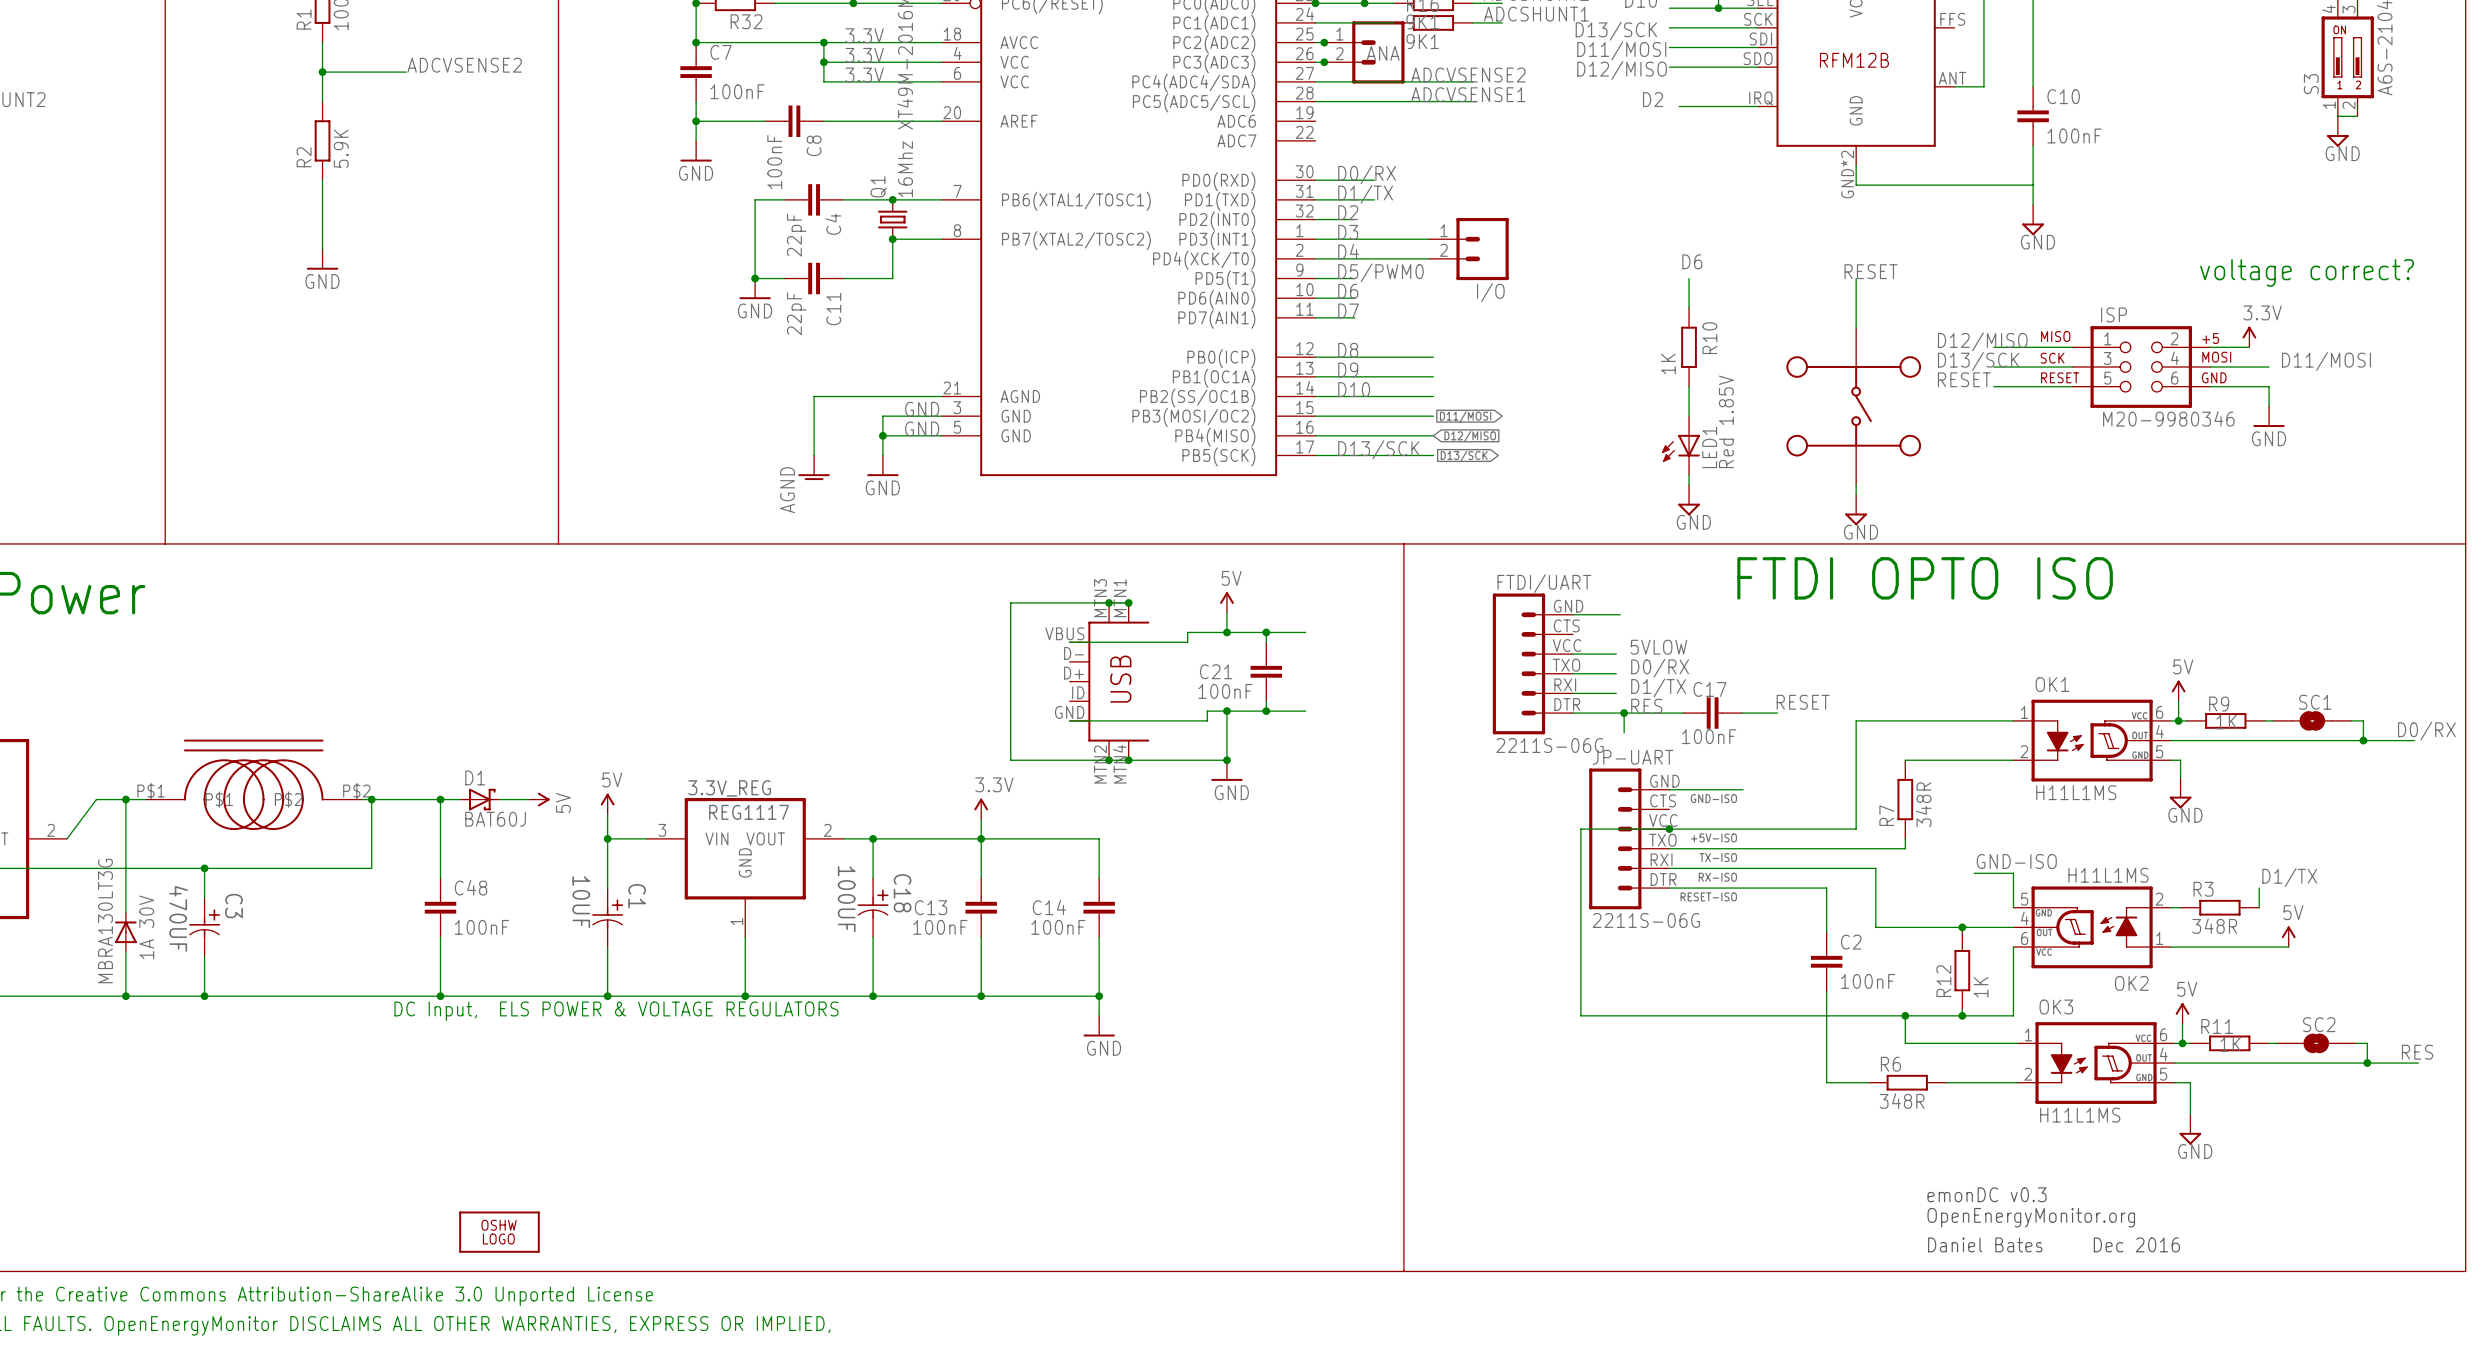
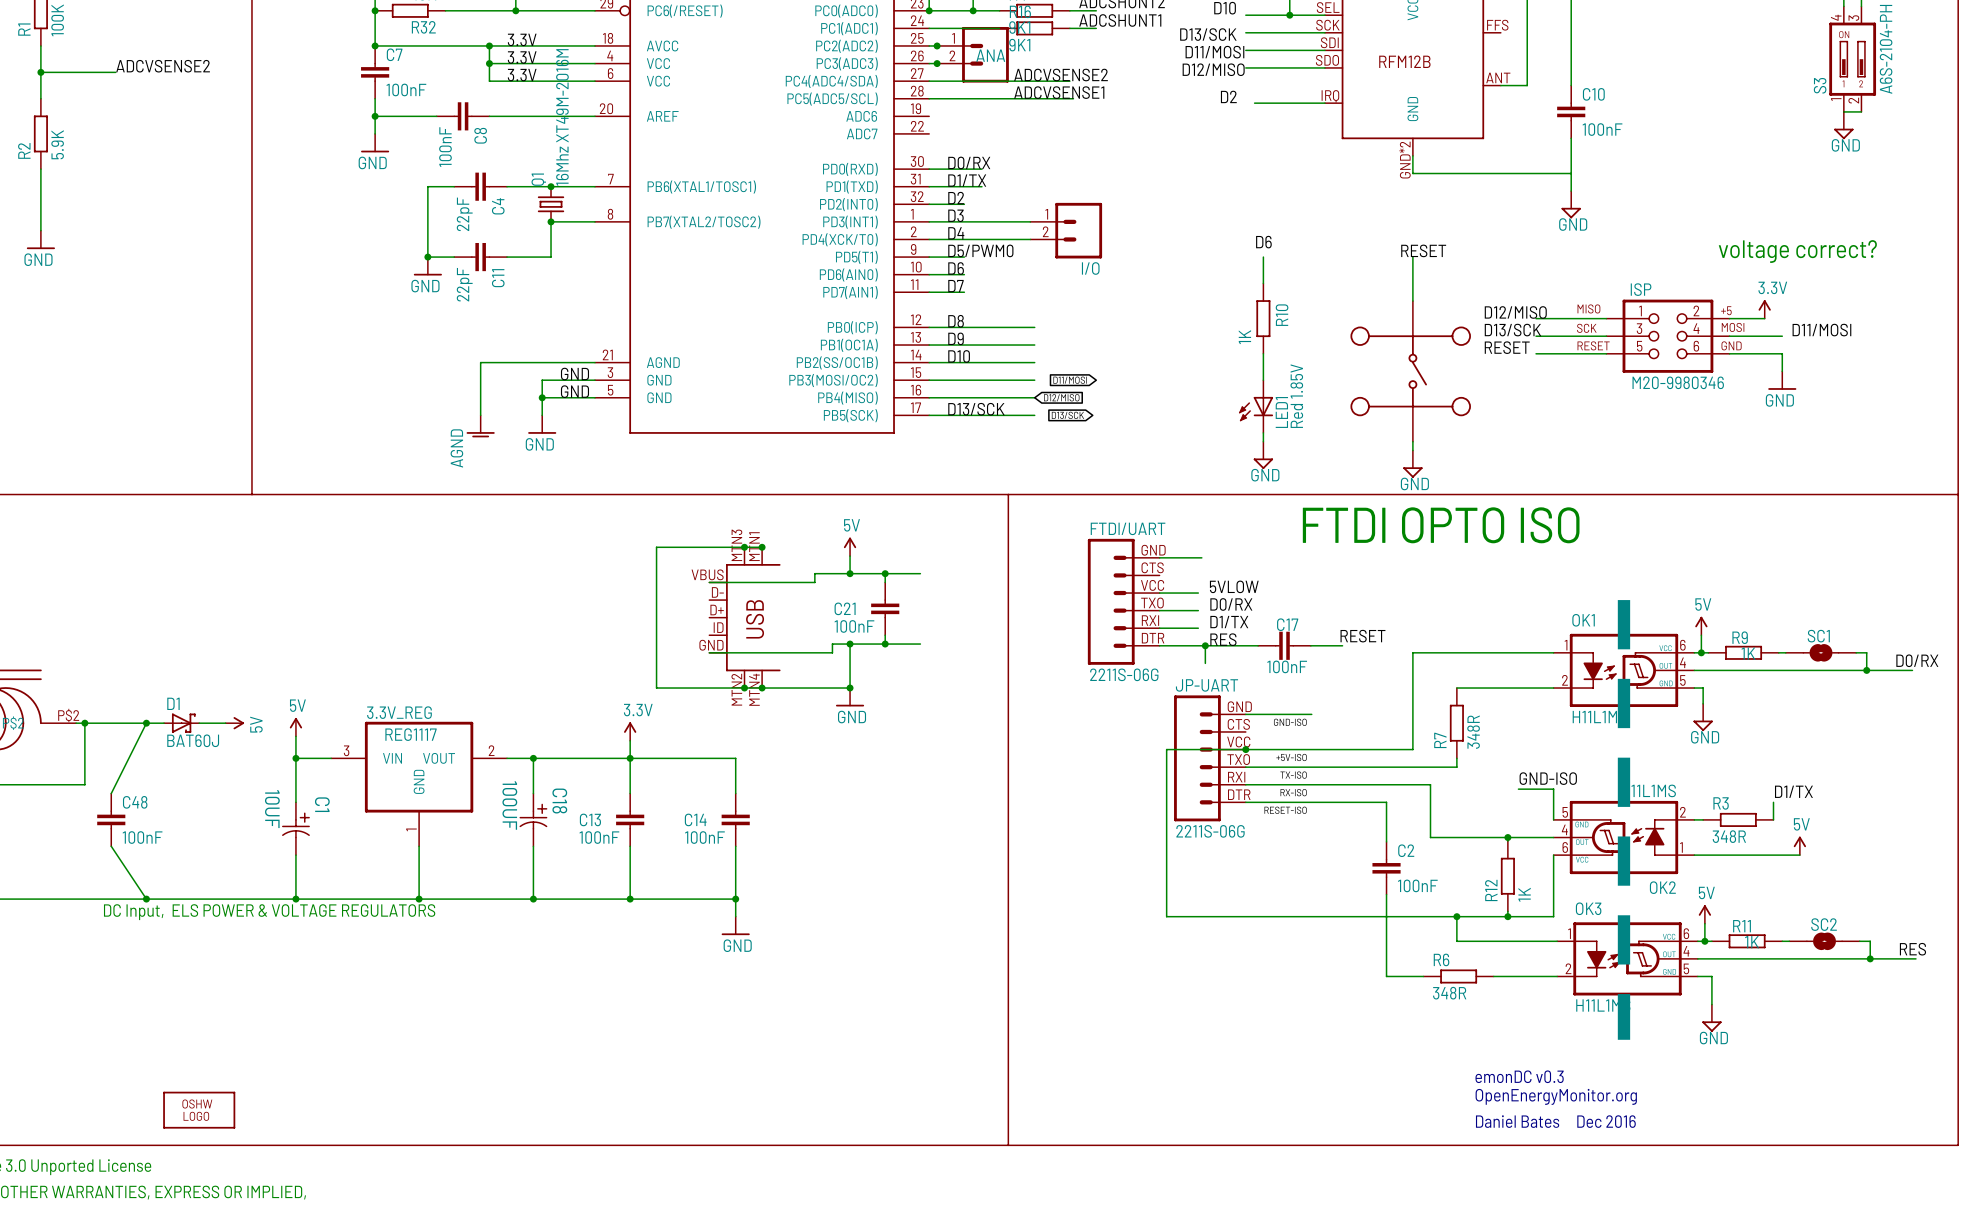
line: none -> (1623, 600) (1623, 1039)
wire: (440, 799) (440, 878) -> (146, 723) (111, 793)
C48 position: (440, 907) -> (111, 819)
wire: (440, 937) (440, 996) -> (111, 846) (146, 899)

